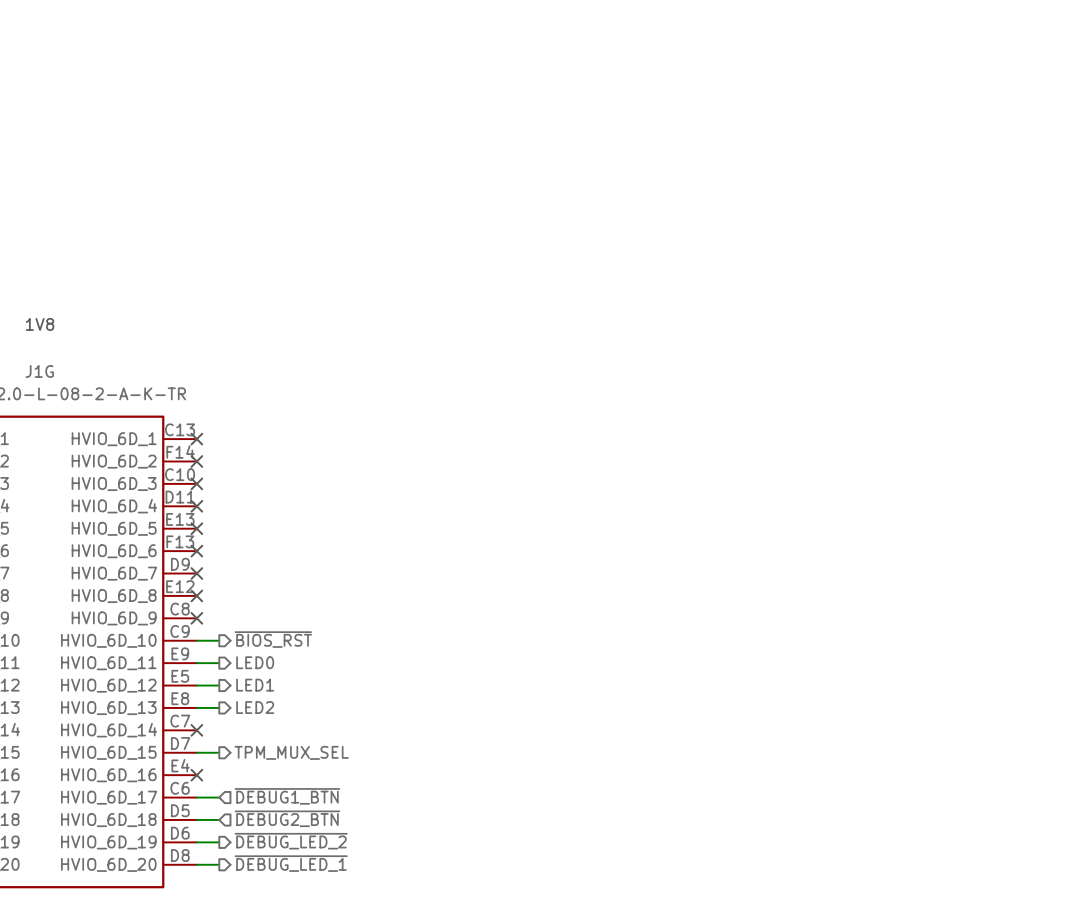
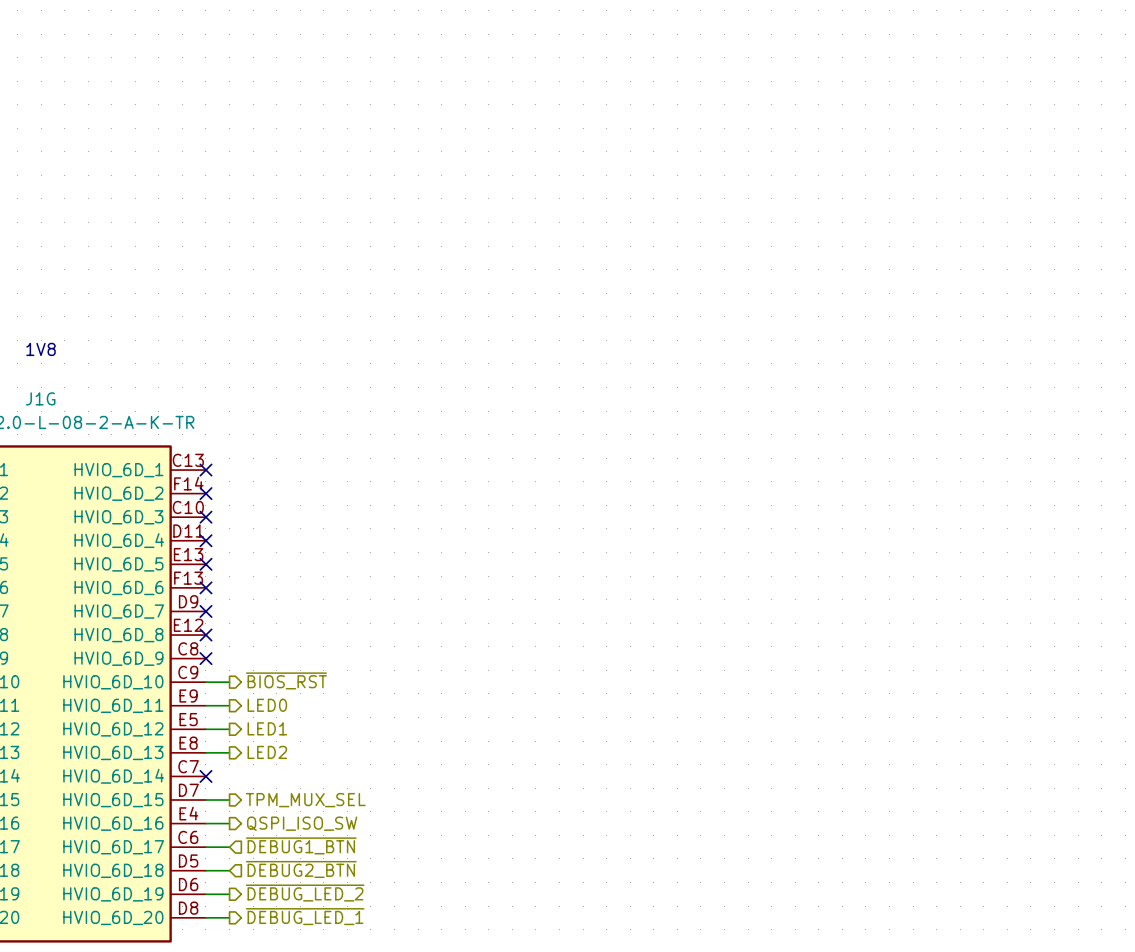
wire: none -> (205, 823) (229, 823)
no-connect mark: (196, 775) -> none
hierarchical label: none -> QSPI_ISO_SW (302, 823)

